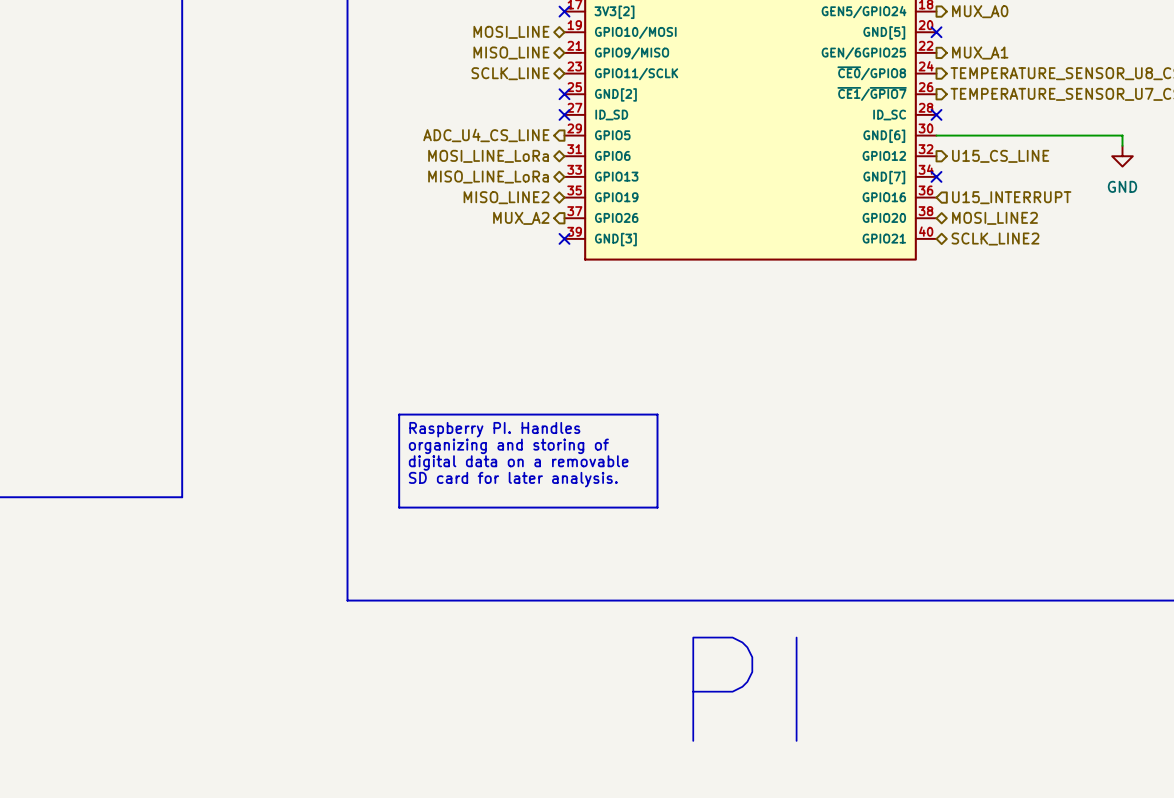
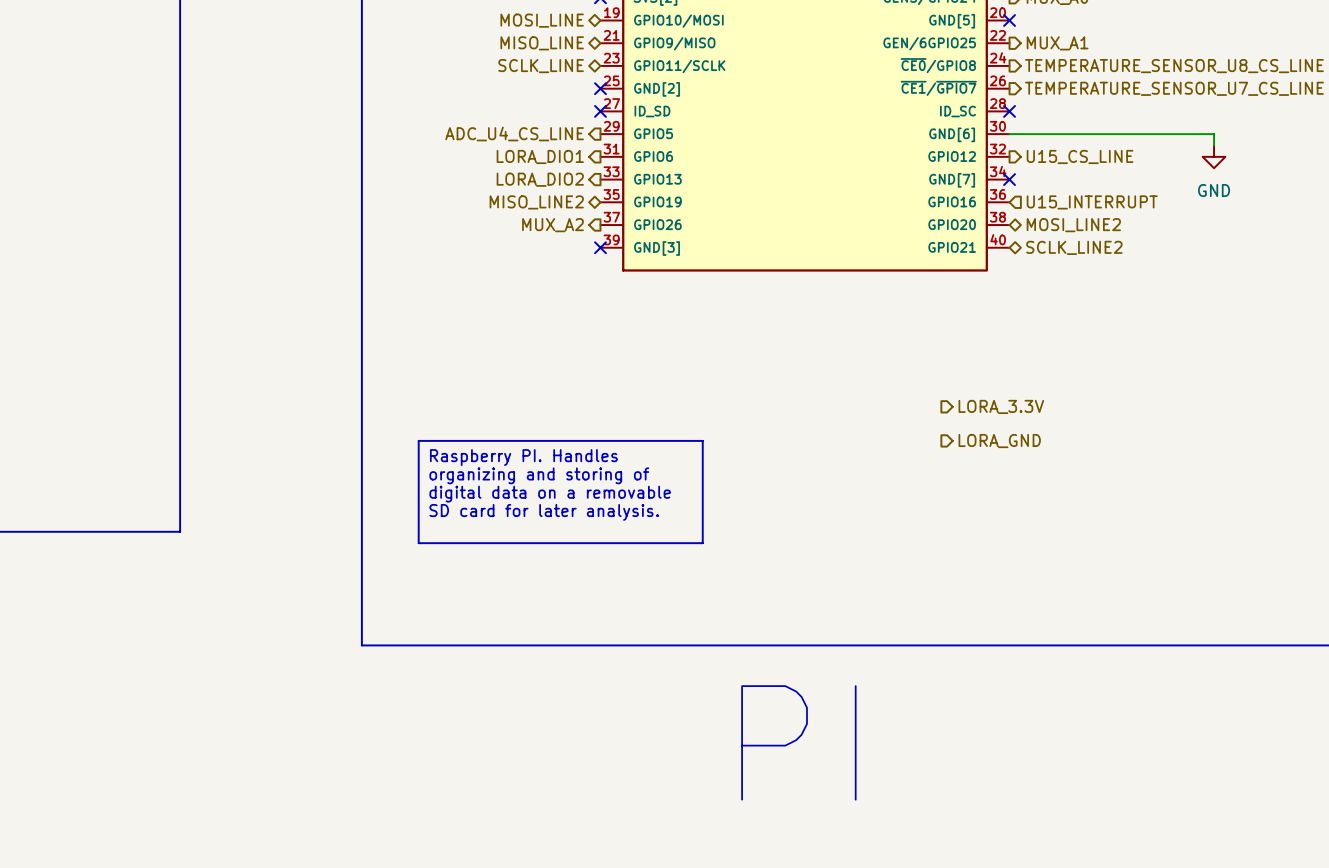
hierarchical label shape: bidirectional (488, 156) -> output (540, 156)
hierarchical label: MOSI_LINE_LoRa (488, 156) -> LORA_DIO1 (540, 156)
hierarchical label shape: bidirectional (488, 177) -> output (540, 179)
hierarchical label: MISO_LINE_LoRa (488, 177) -> LORA_DIO2 (540, 179)
hierarchical label: none -> LORA_3.3V (1001, 406)
hierarchical label: none -> LORA_GND (999, 441)

